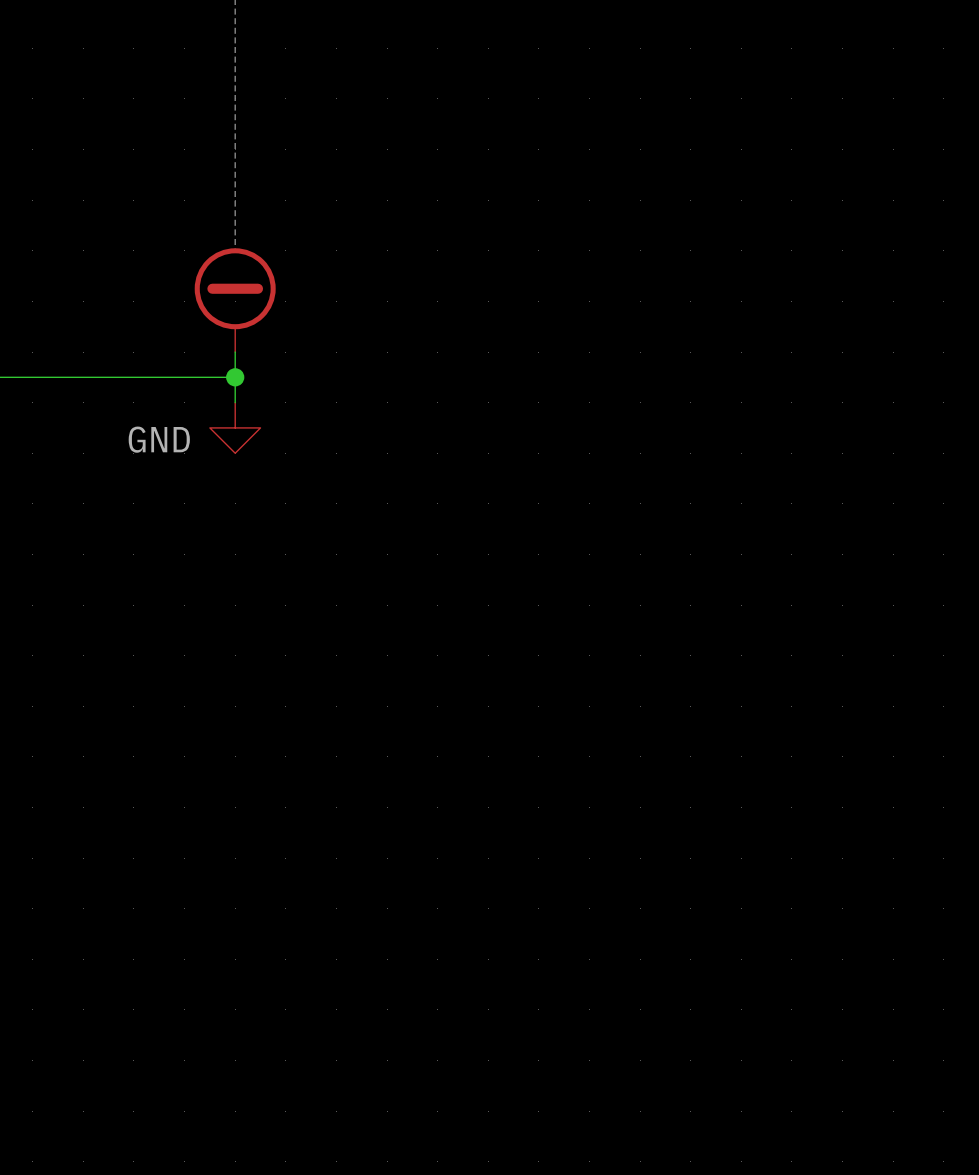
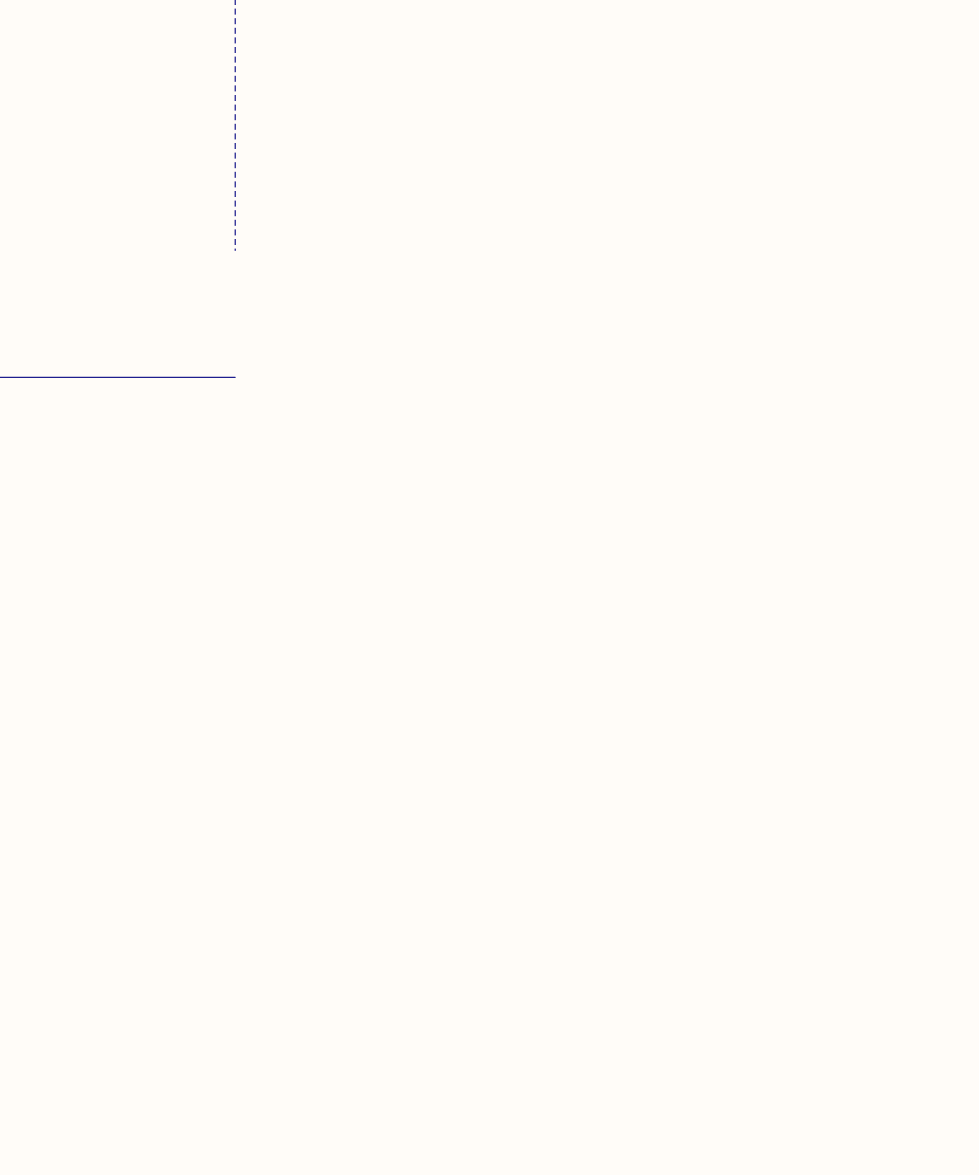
power symbol: (235, 300) -> none
wire: (235, 352) (235, 402) -> none
junction: (235, 377) -> none
power symbol: GND (235, 427) -> none

